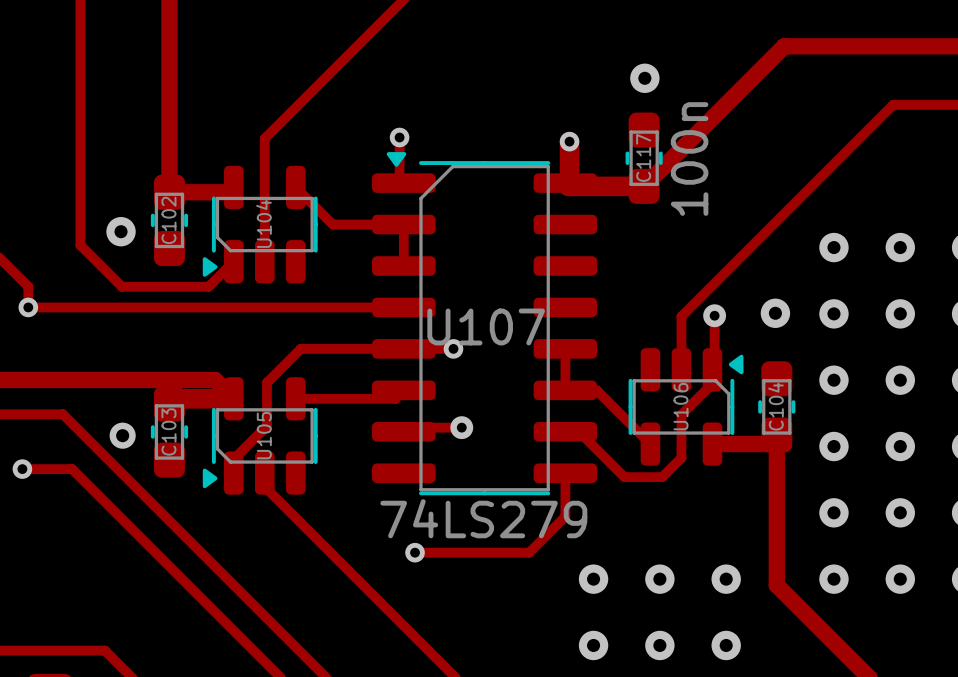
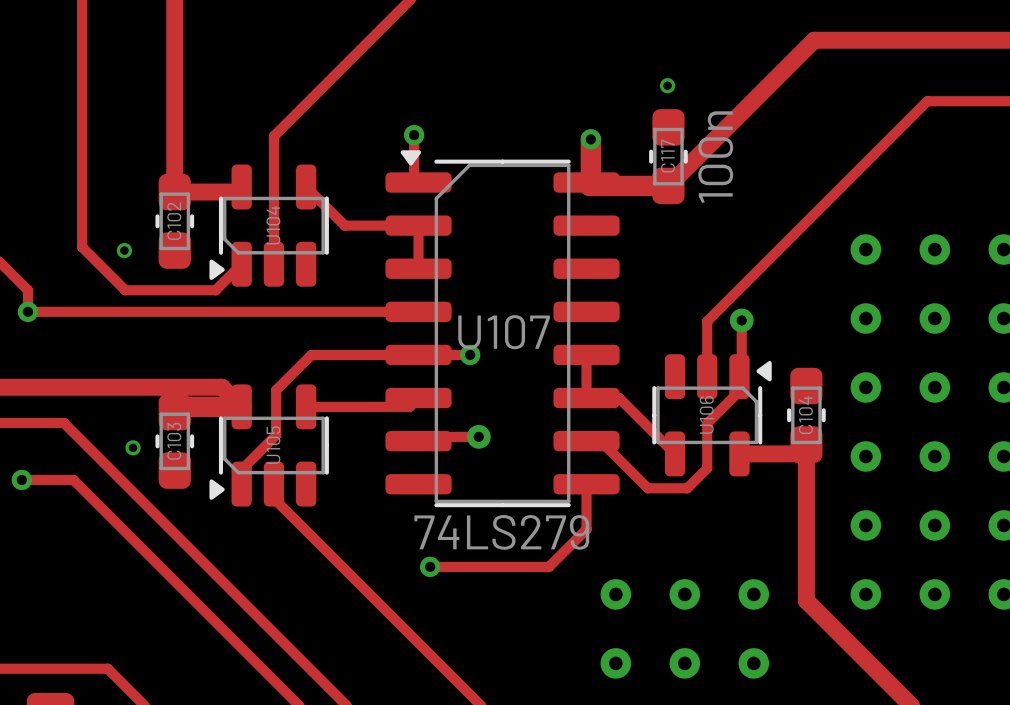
via size: [630, 63, 660, 93] -> [659, 78, 676, 94]
via size: [106, 217, 136, 247] -> [116, 242, 133, 259]
via: (775, 313) -> none
via size: [109, 422, 136, 449] -> [125, 440, 141, 456]

